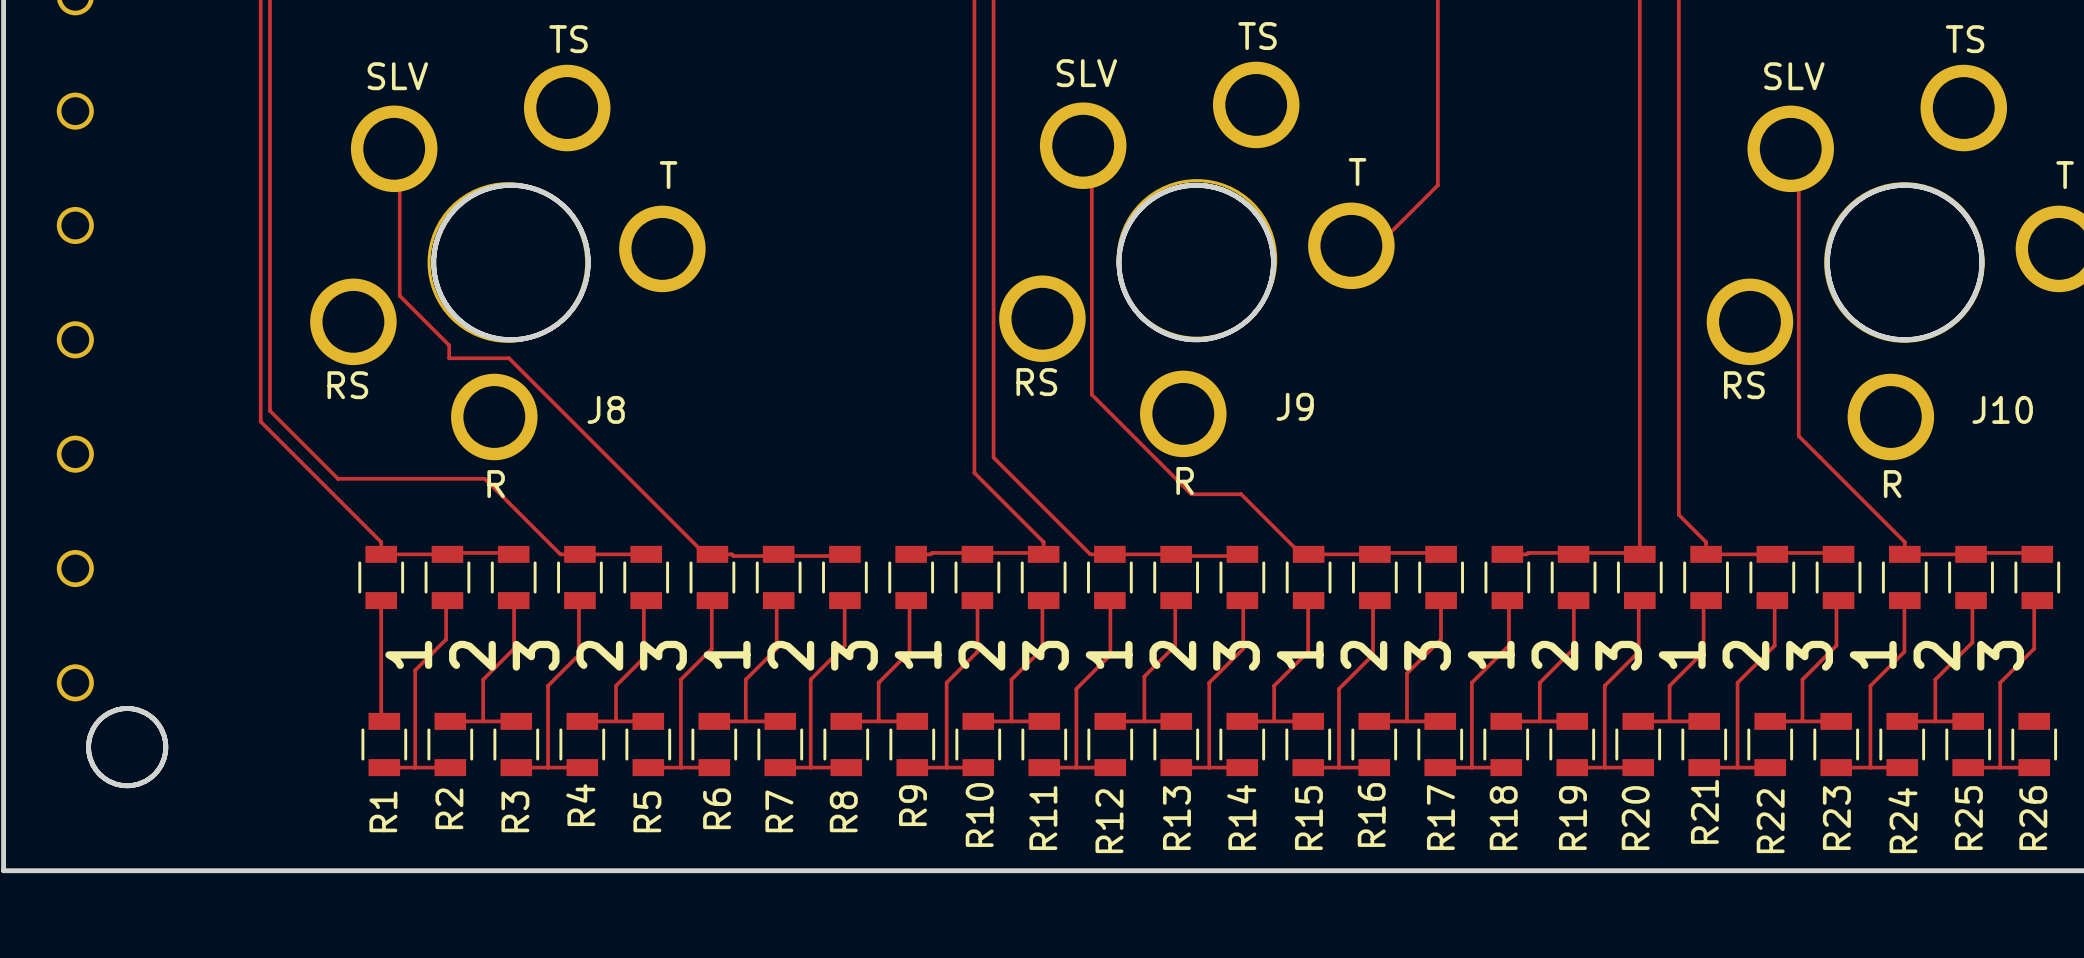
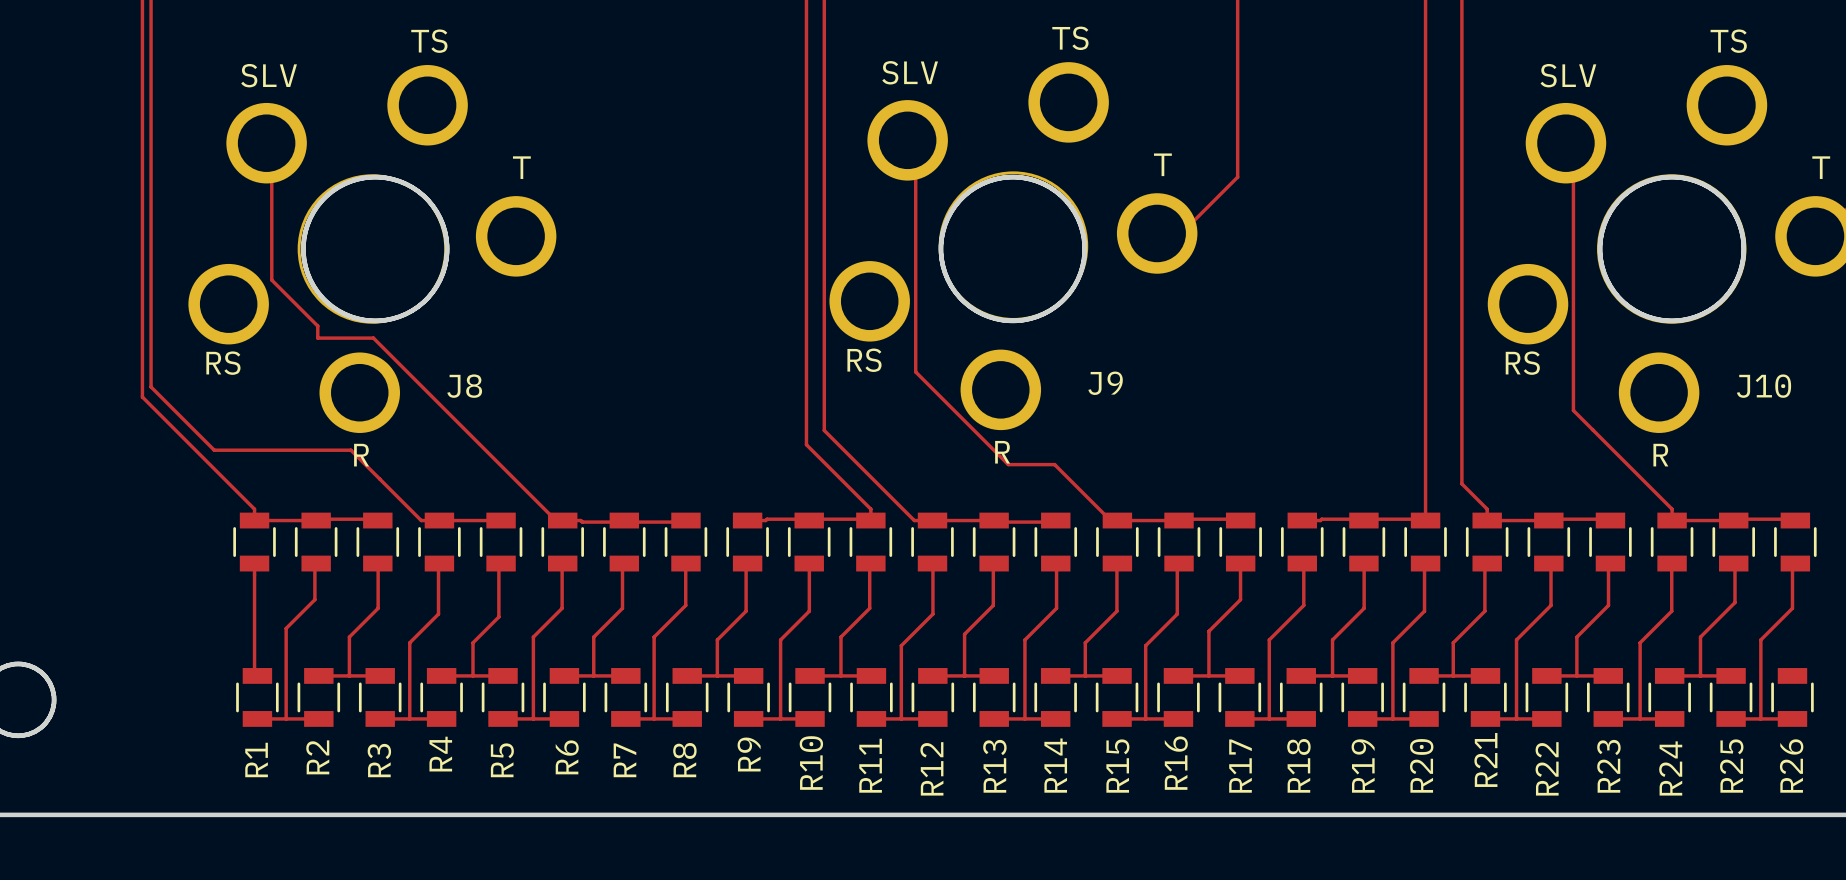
text: 1 (408, 654) -> none
text: 1 (727, 654) -> none
text: 1 (918, 654) -> none
text: 1 (1109, 654) -> none
text: 1 (1300, 654) -> none
text: 1 (1491, 654) -> none
text: 1 (1682, 654) -> none
text: 1 (1873, 654) -> none
text: 2 (472, 655) -> none
text: 3 (536, 655) -> none
text: 2 (599, 655) -> none
text: 3 (663, 655) -> none
text: 2 (790, 655) -> none
text: 3 (854, 655) -> none
text: 2 (981, 655) -> none
text: 3 (1045, 655) -> none
text: 2 (1172, 655) -> none
text: 3 (1236, 655) -> none
text: 2 (1363, 655) -> none
text: 3 (1427, 655) -> none
text: 2 (1554, 655) -> none
text: 3 (1618, 655) -> none
text: 2 (1745, 655) -> none
text: 3 (1809, 655) -> none
text: 2 (1936, 655) -> none
text: 3 (2000, 655) -> none

